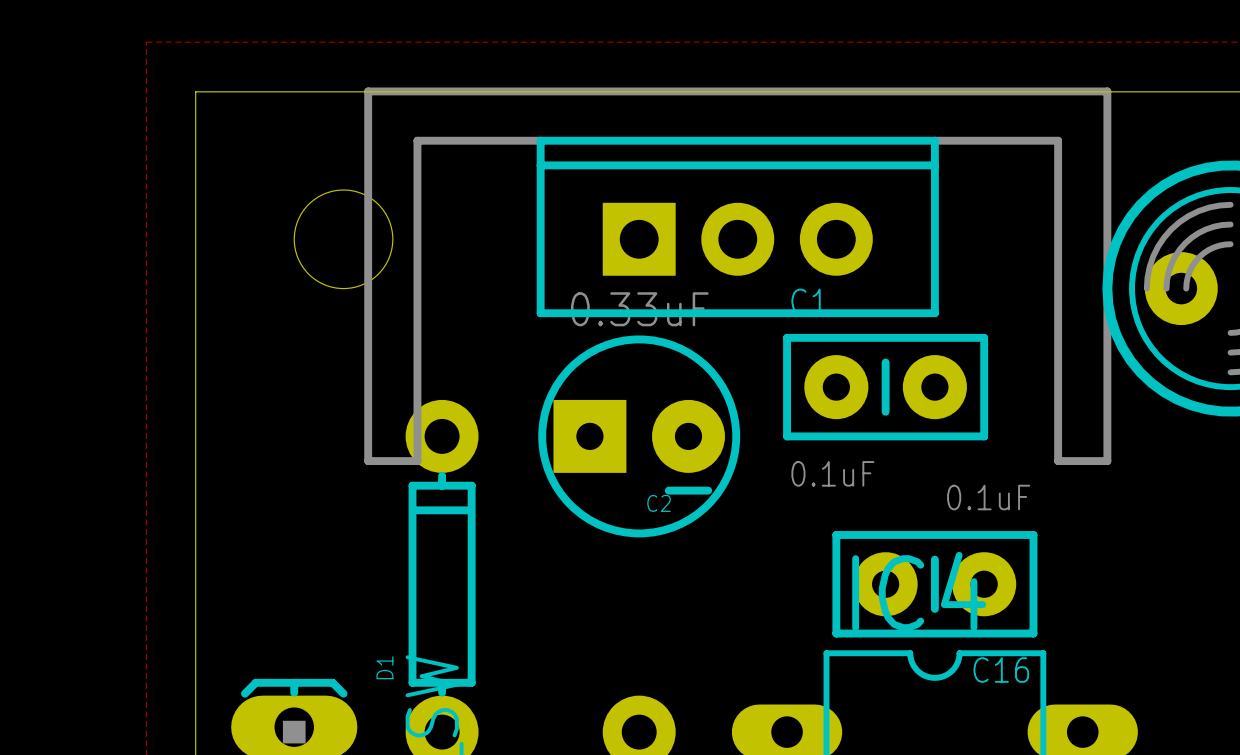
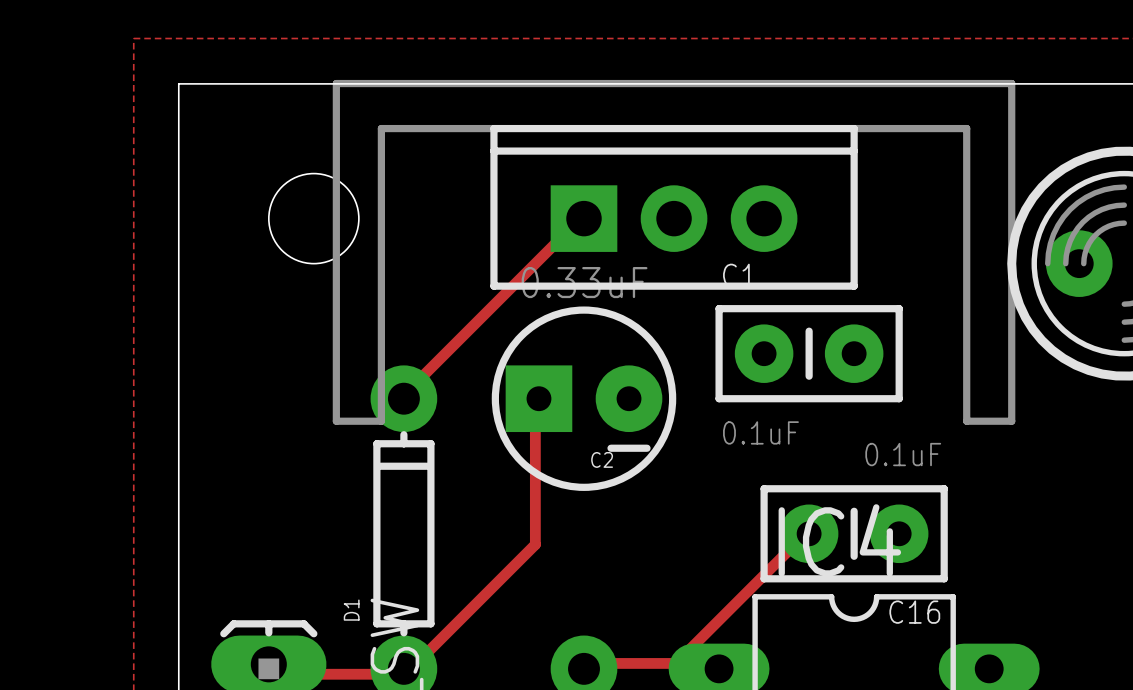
track: none -> (584, 218) (578, 220) (405, 393) (403, 398)
track: none -> (538, 398) (535, 404) (535, 544) (405, 674) (403, 668) (394, 674) (276, 674) (268, 664)
track: none -> (809, 533) (805, 533) (675, 663) (719, 668) (719, 663) (589, 663) (584, 668)

